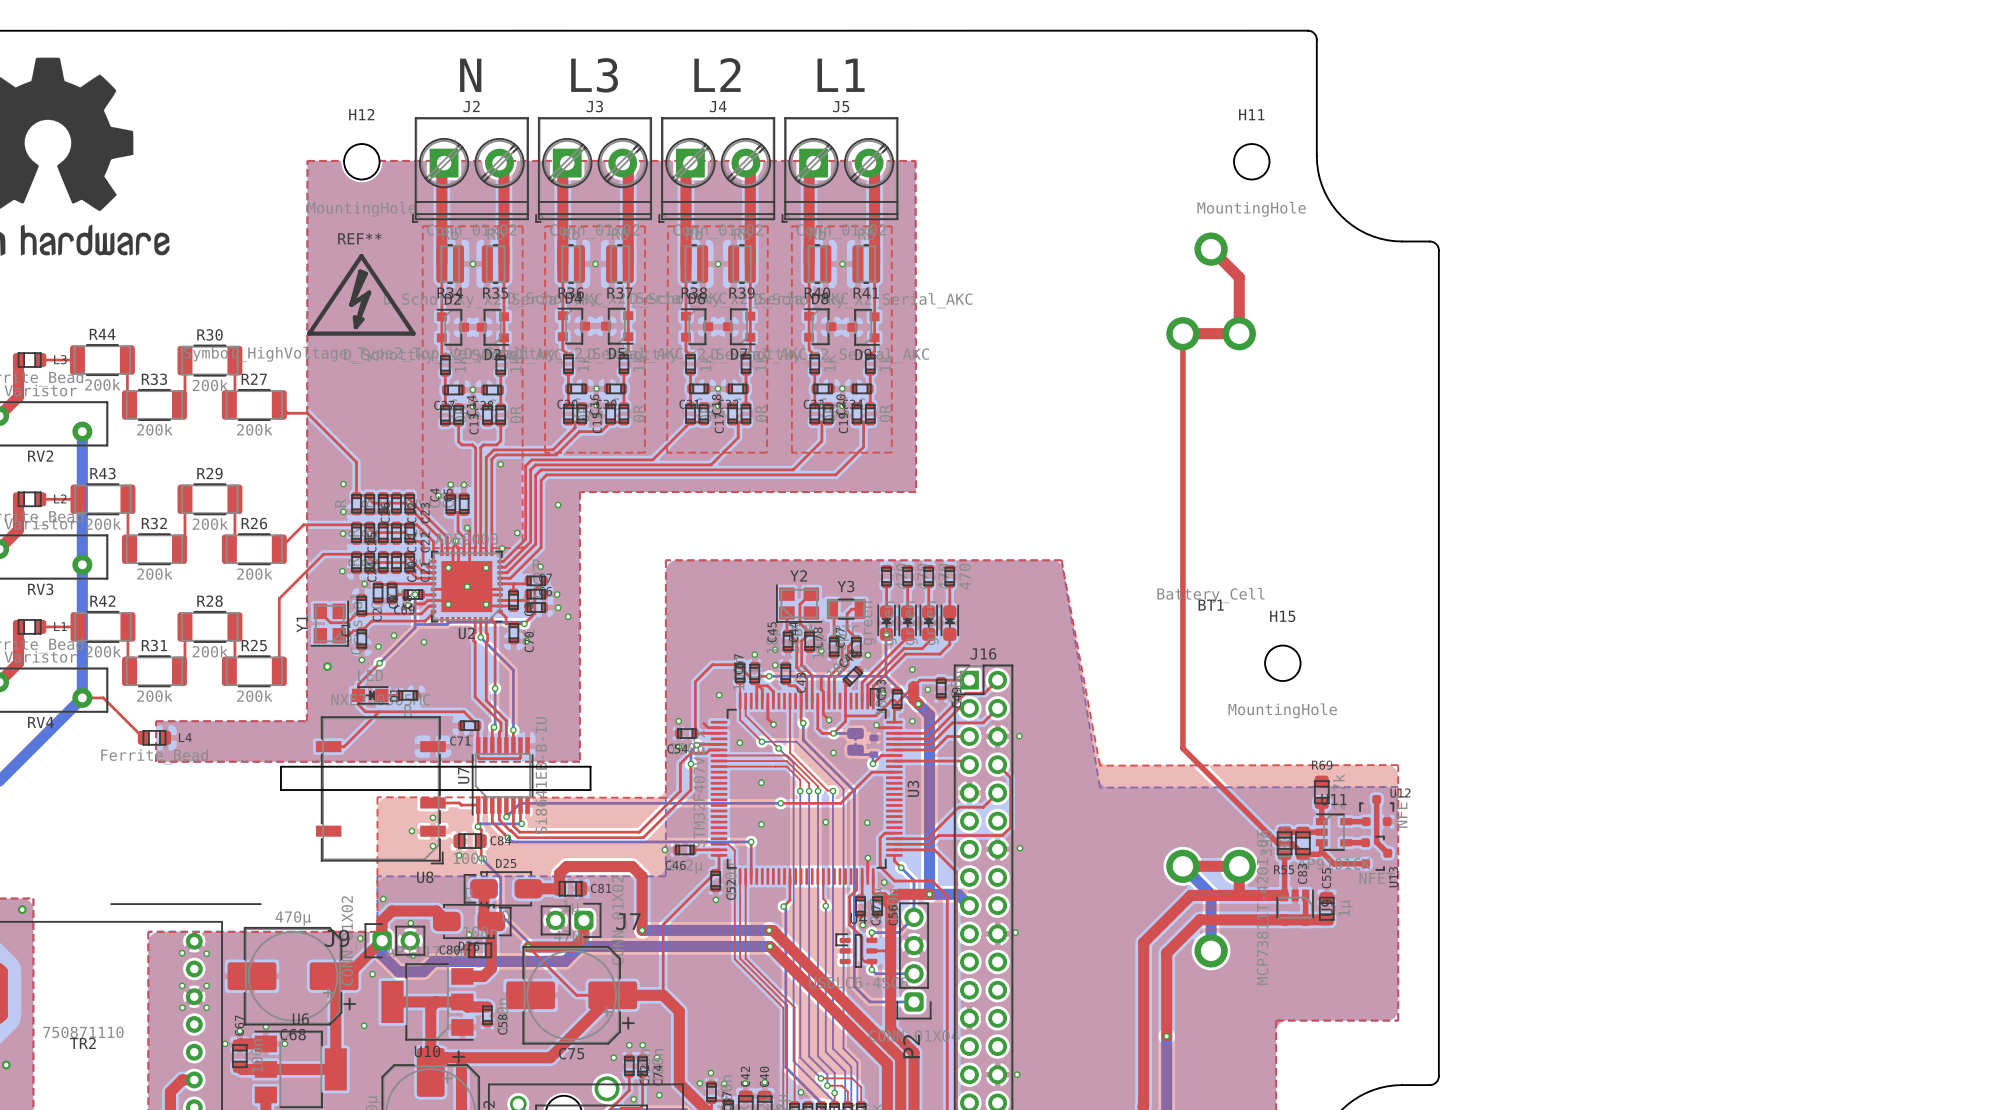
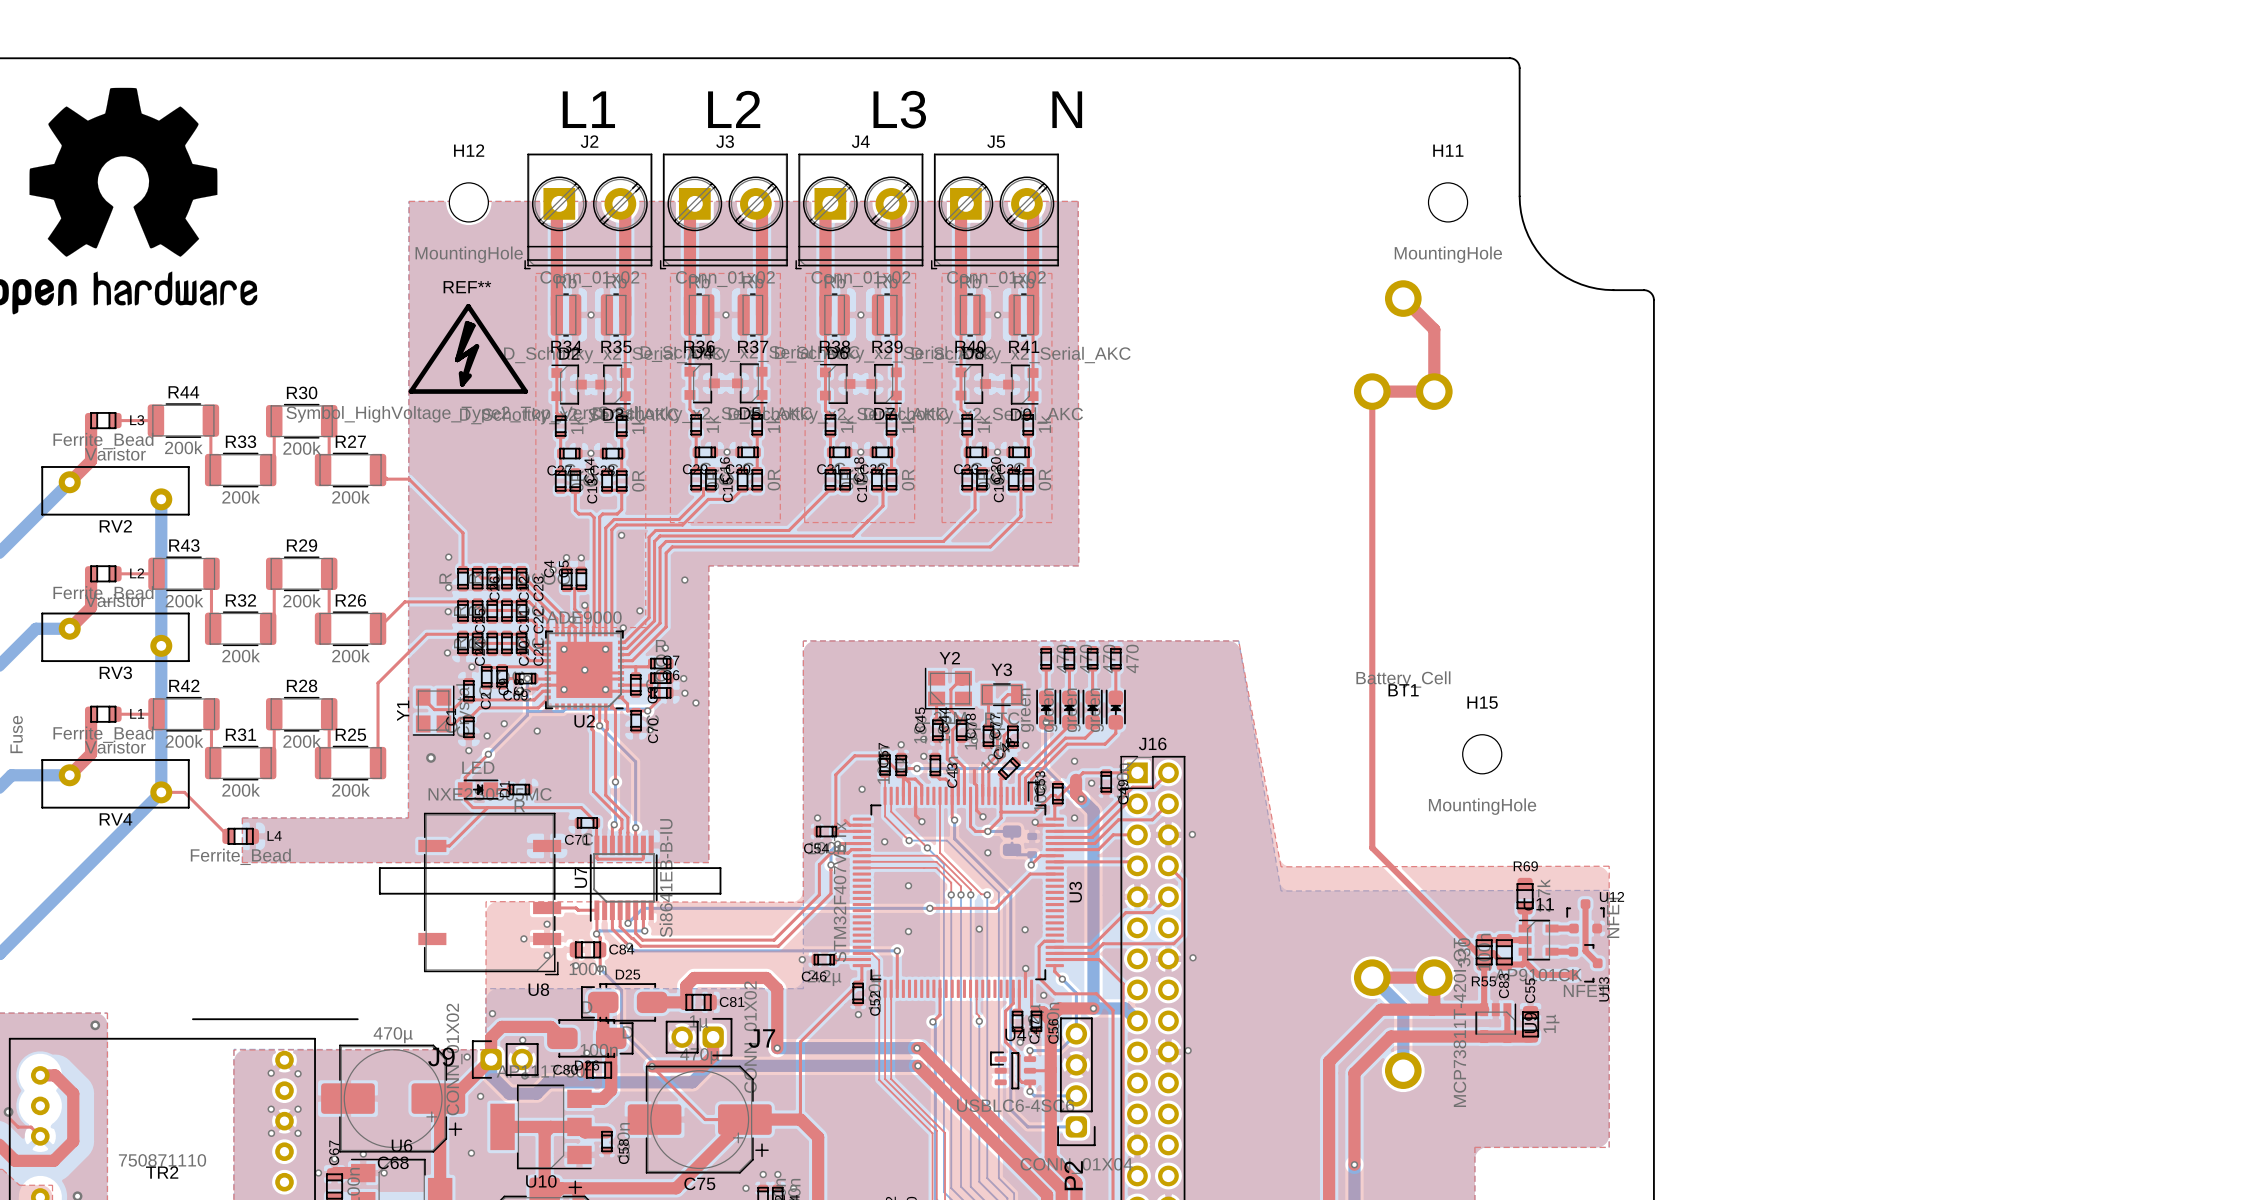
text: N (470, 75) -> L1 (588, 109)
text: L3 (594, 75) -> L2 (734, 109)
text: L2 (717, 75) -> none
text: L1 (841, 75) -> none
text: none -> L3 (899, 109)
text: none -> N (1067, 109)

